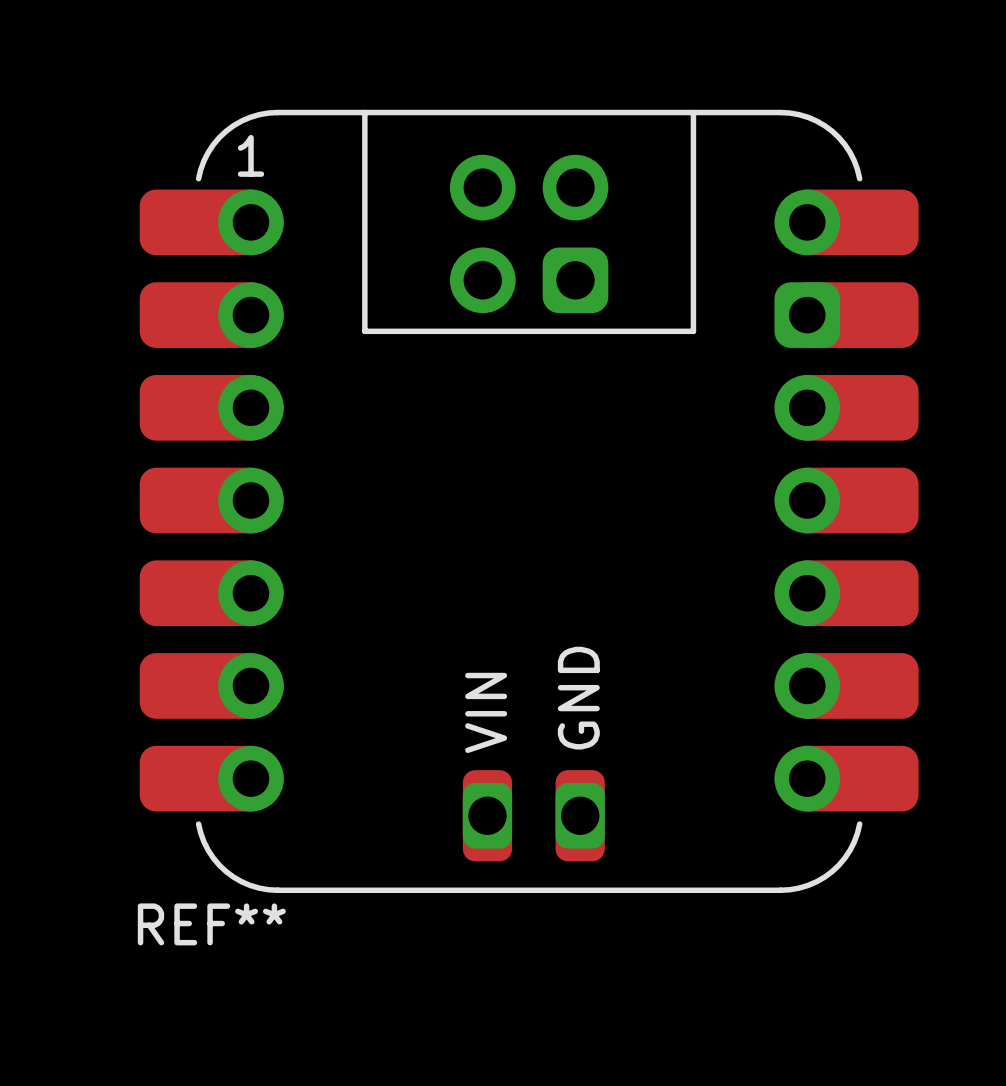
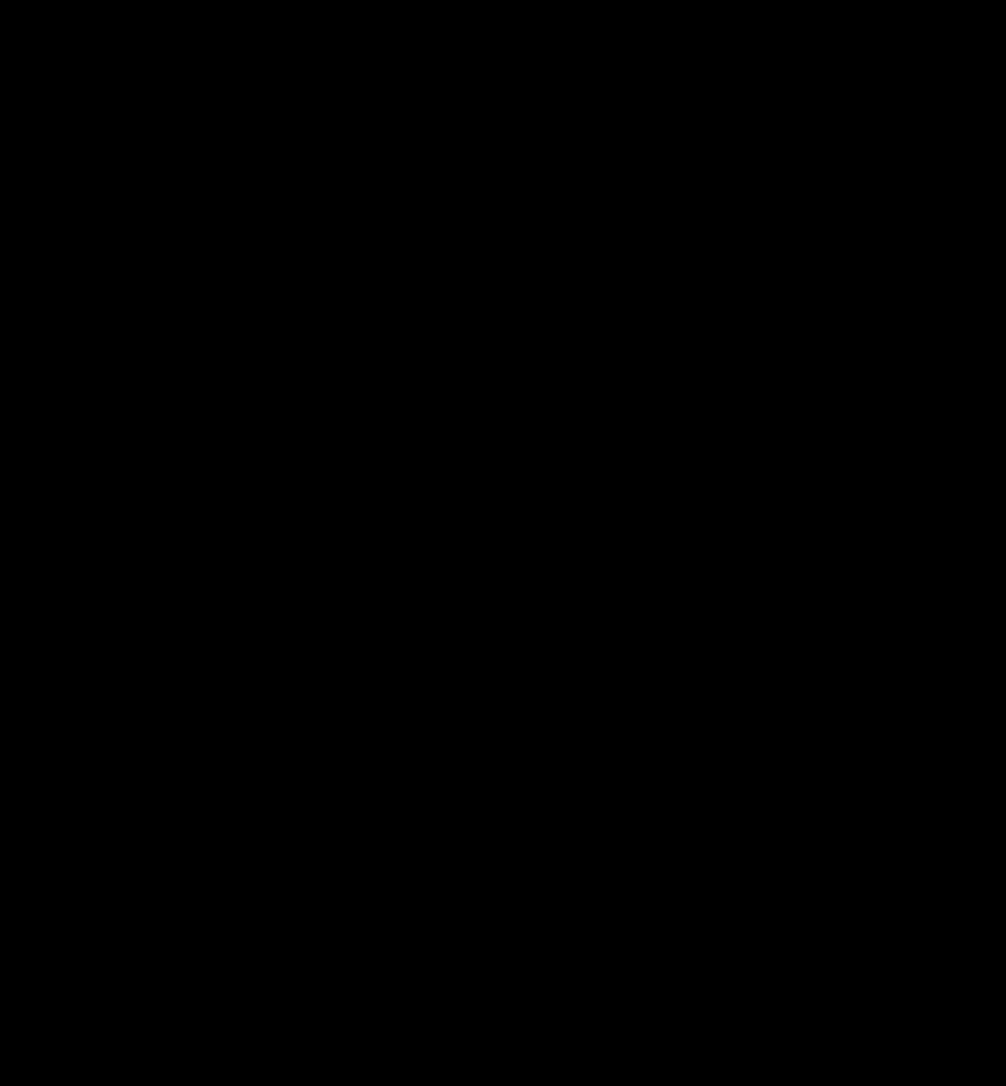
REF**: (529, 501) -> none

